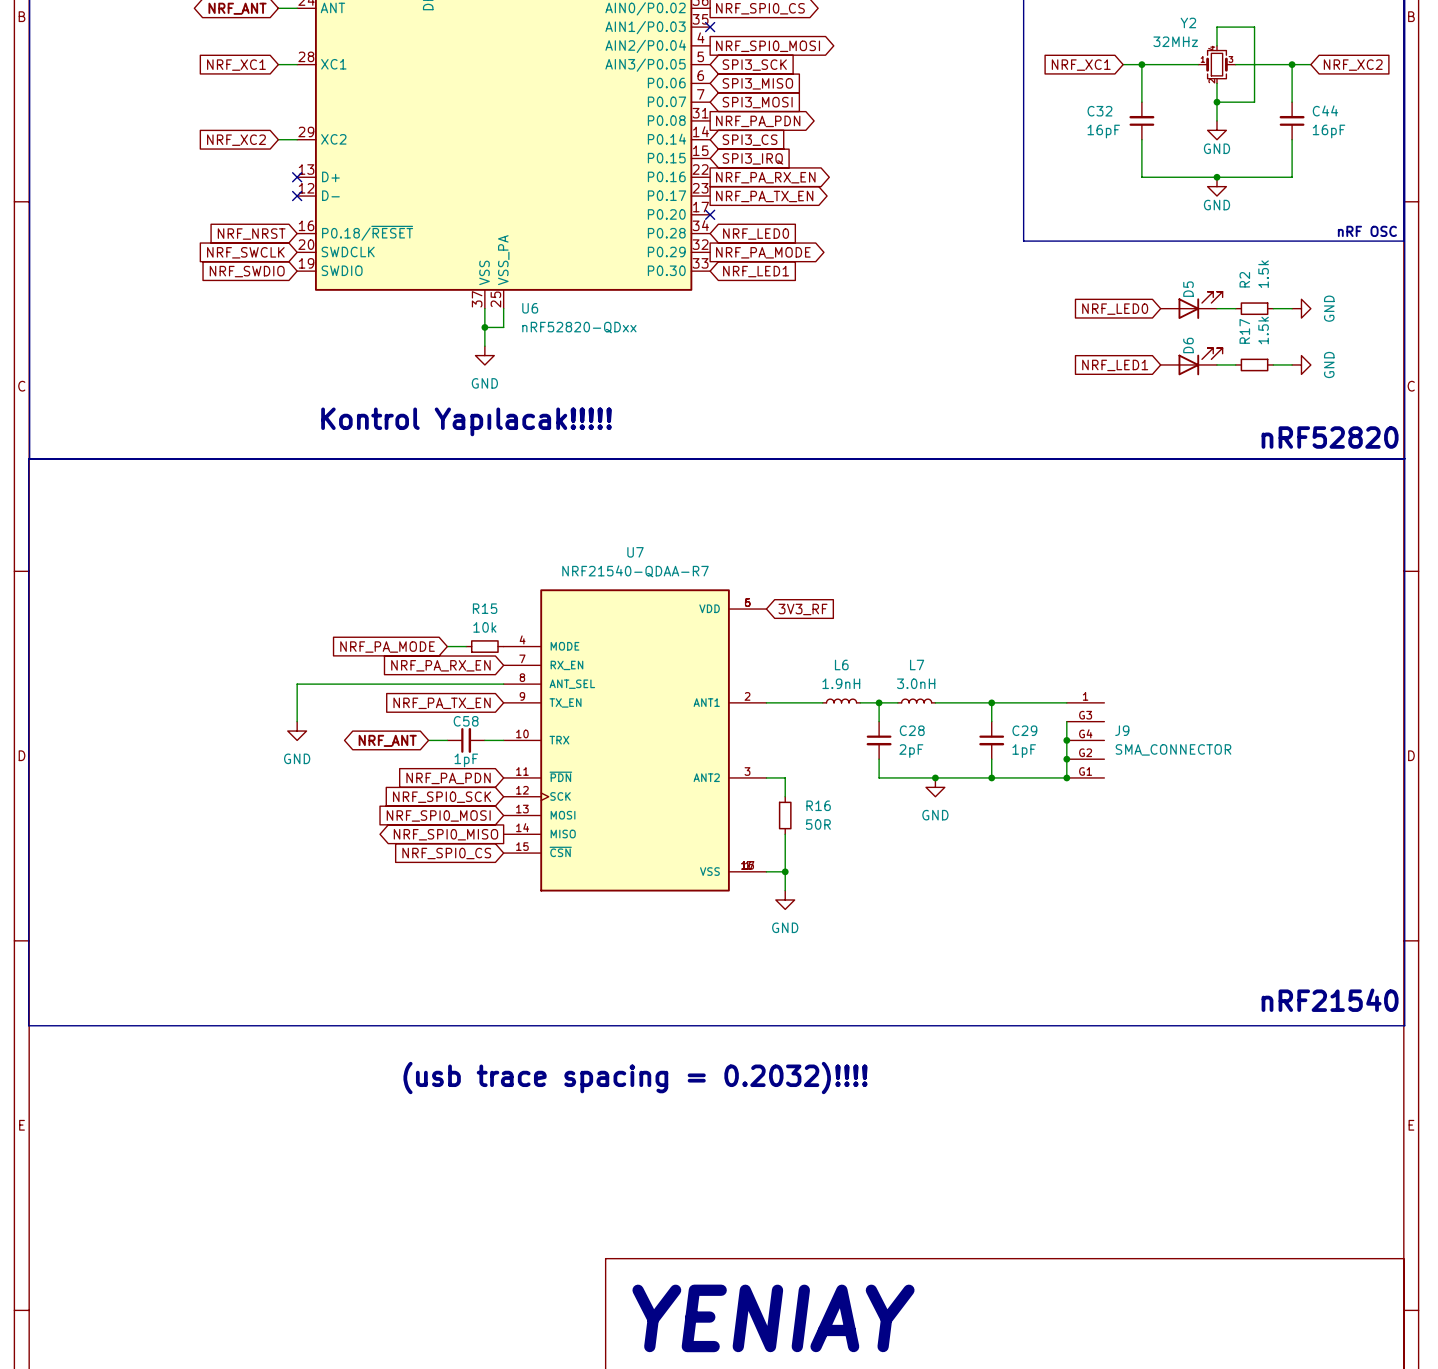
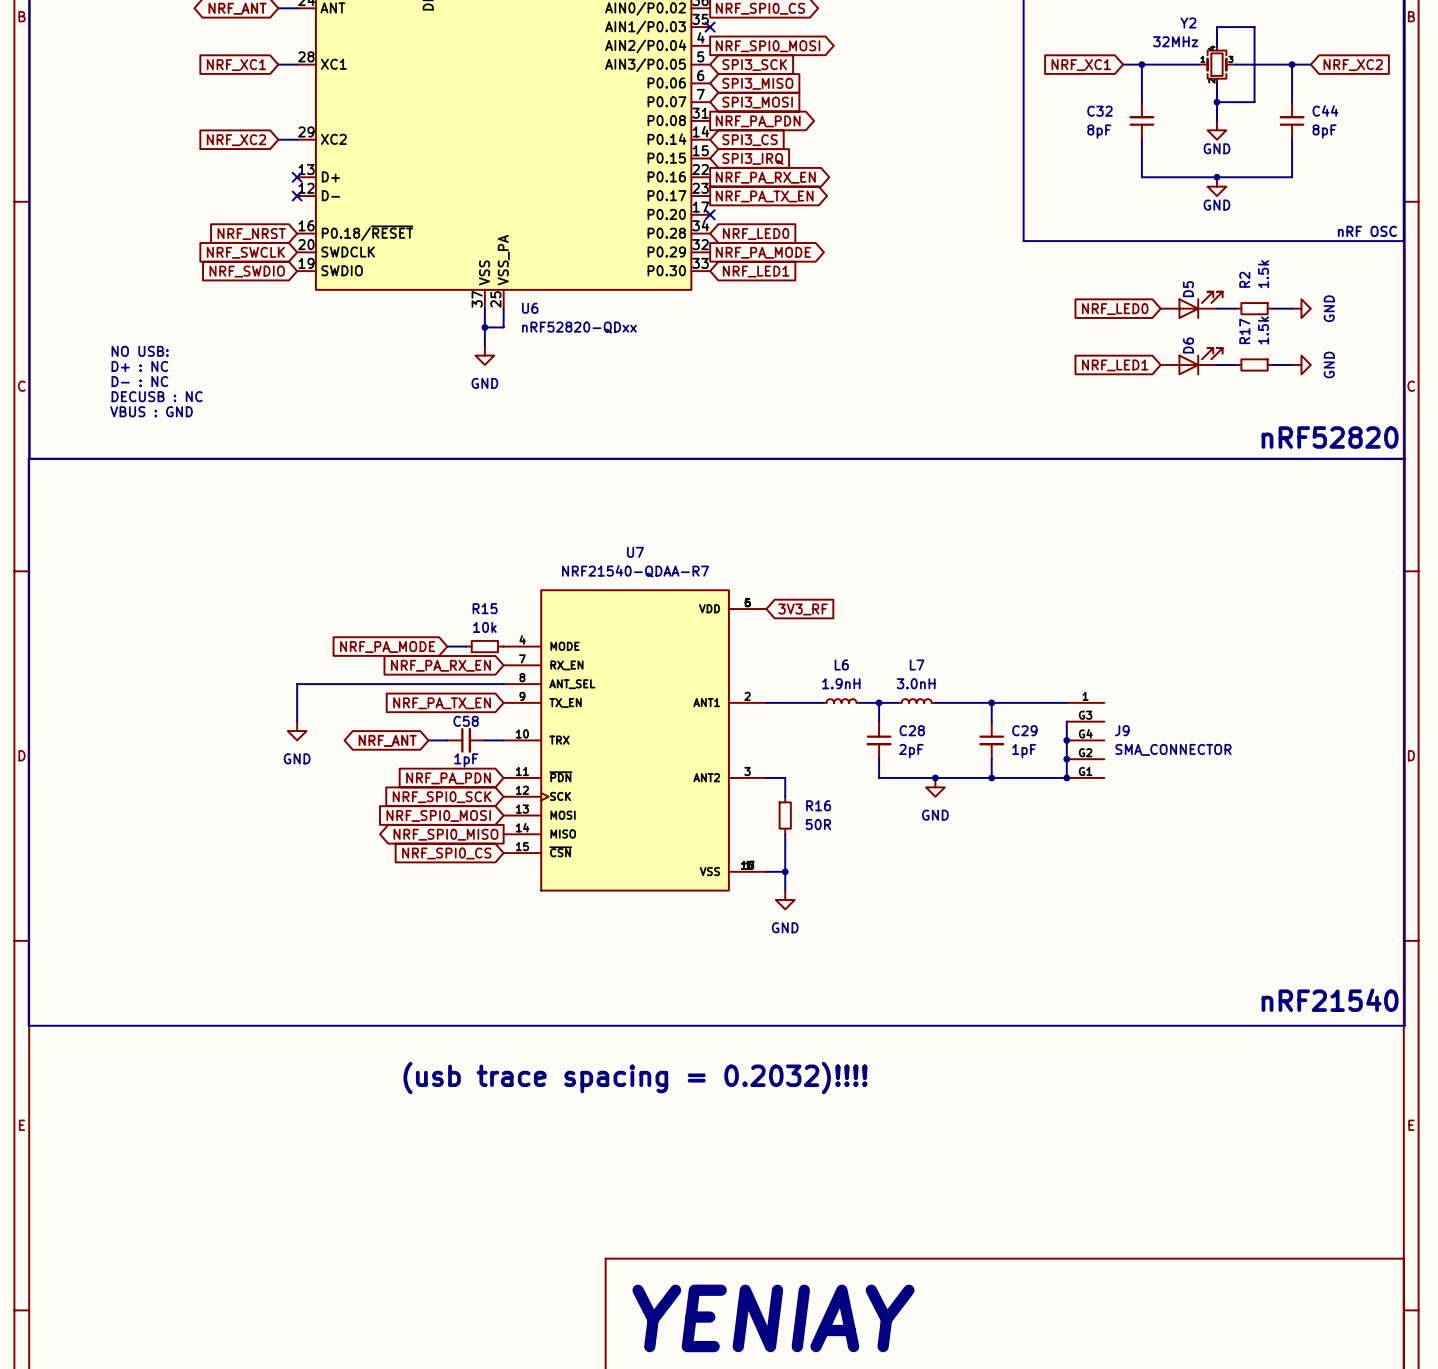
C32 value: 16pF (1103, 131) -> 8pF (1099, 131)
C44 value: 16pF (1329, 131) -> 8pF (1324, 131)
text: none -> NO USB: (140, 351)
text: none -> D+ : NC (139, 366)
text: none -> D- : NC (139, 381)
text: none -> DECUSB : NC (157, 396)
text: none -> VBUS : GND (151, 411)
text: Kontrol Yapılacak!!!!! (466, 421) -> none

